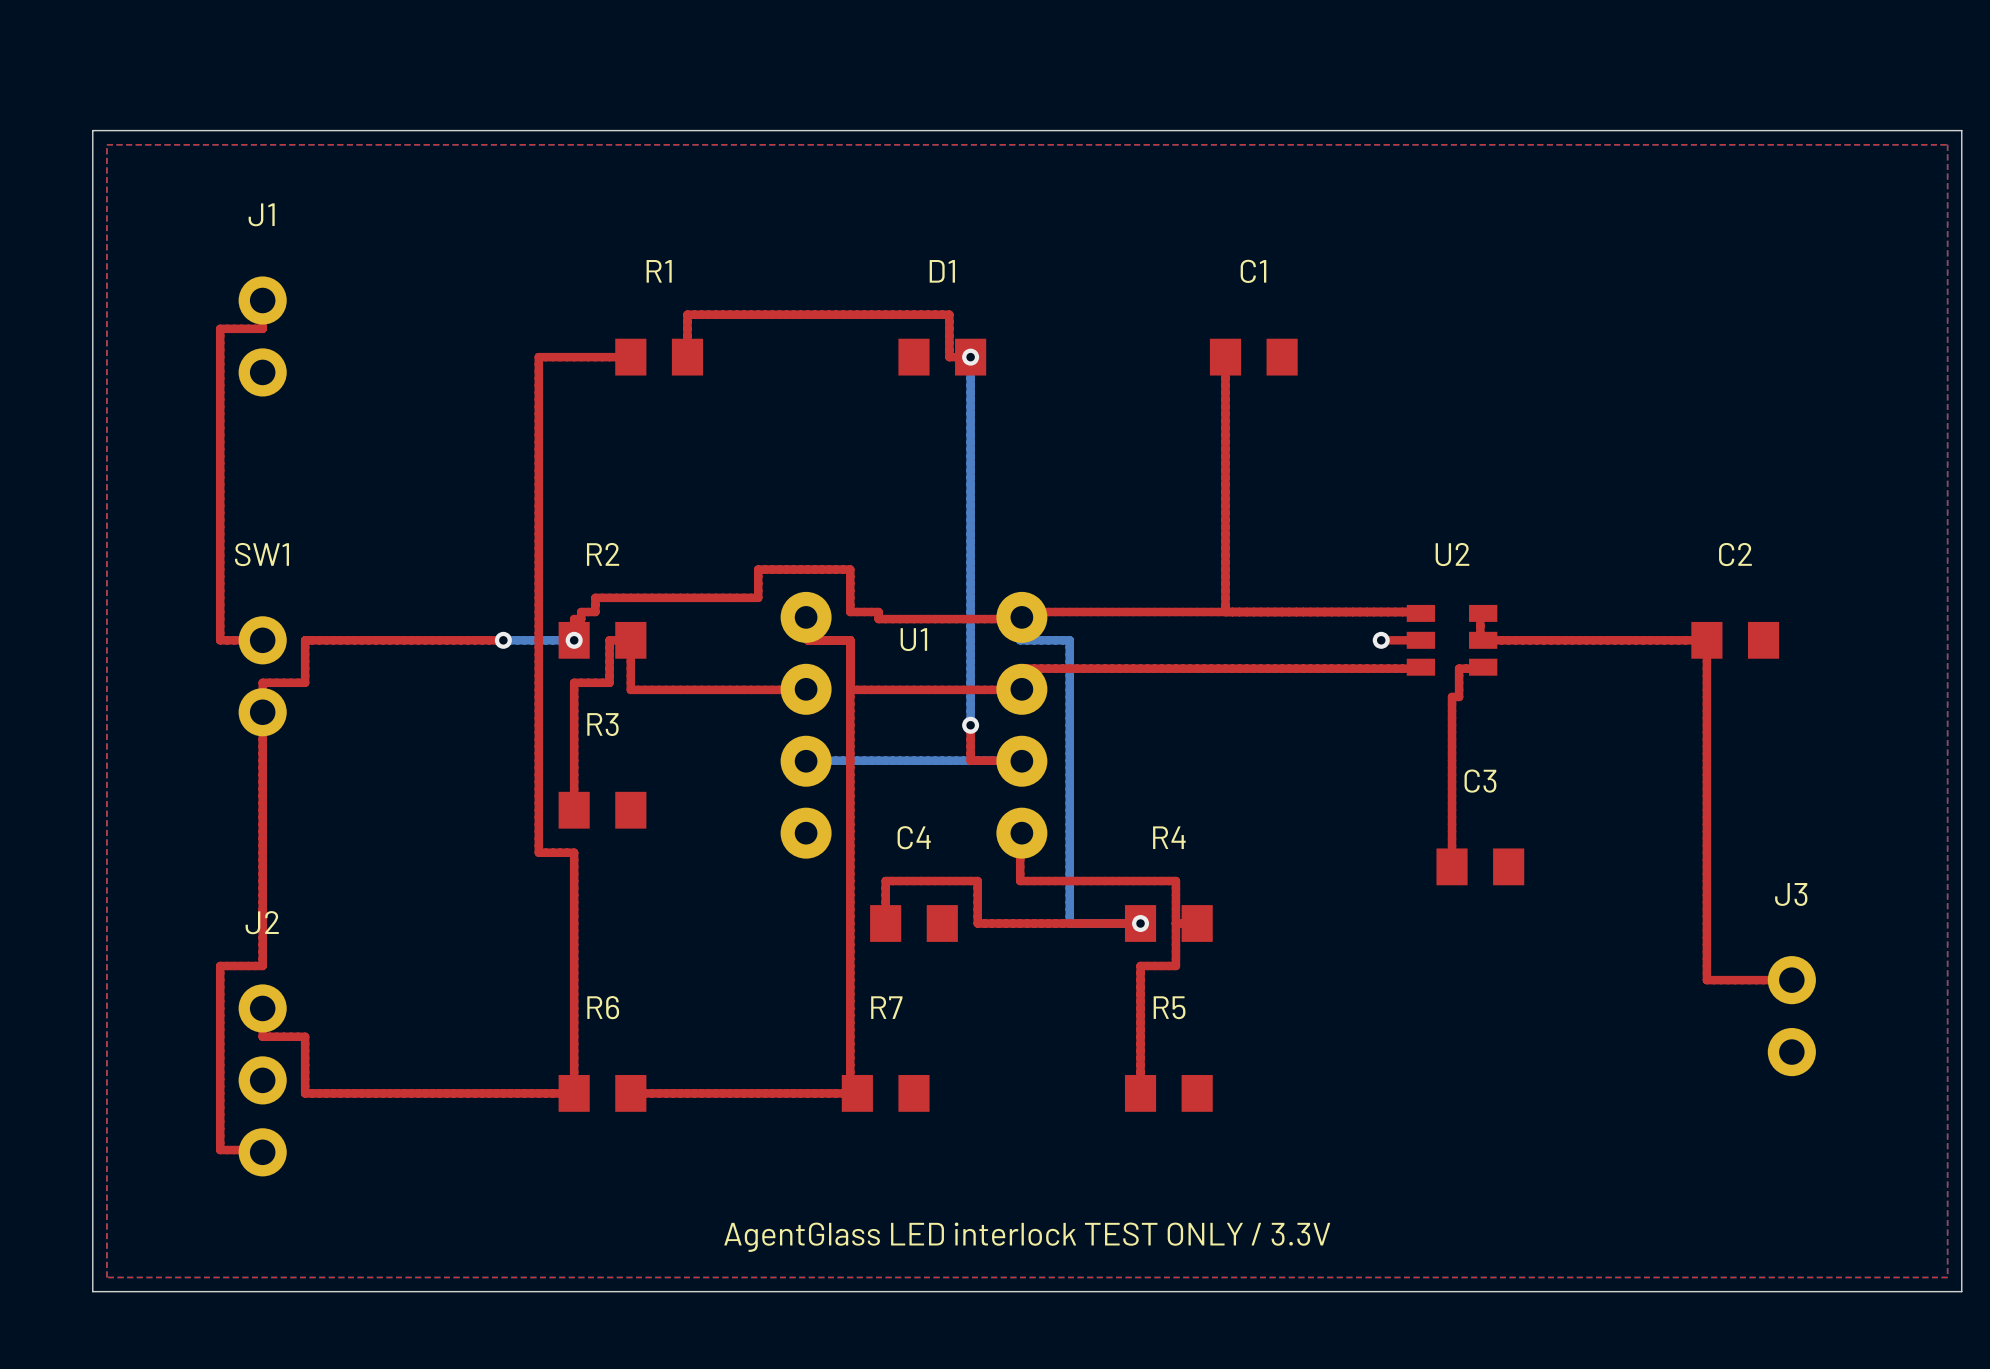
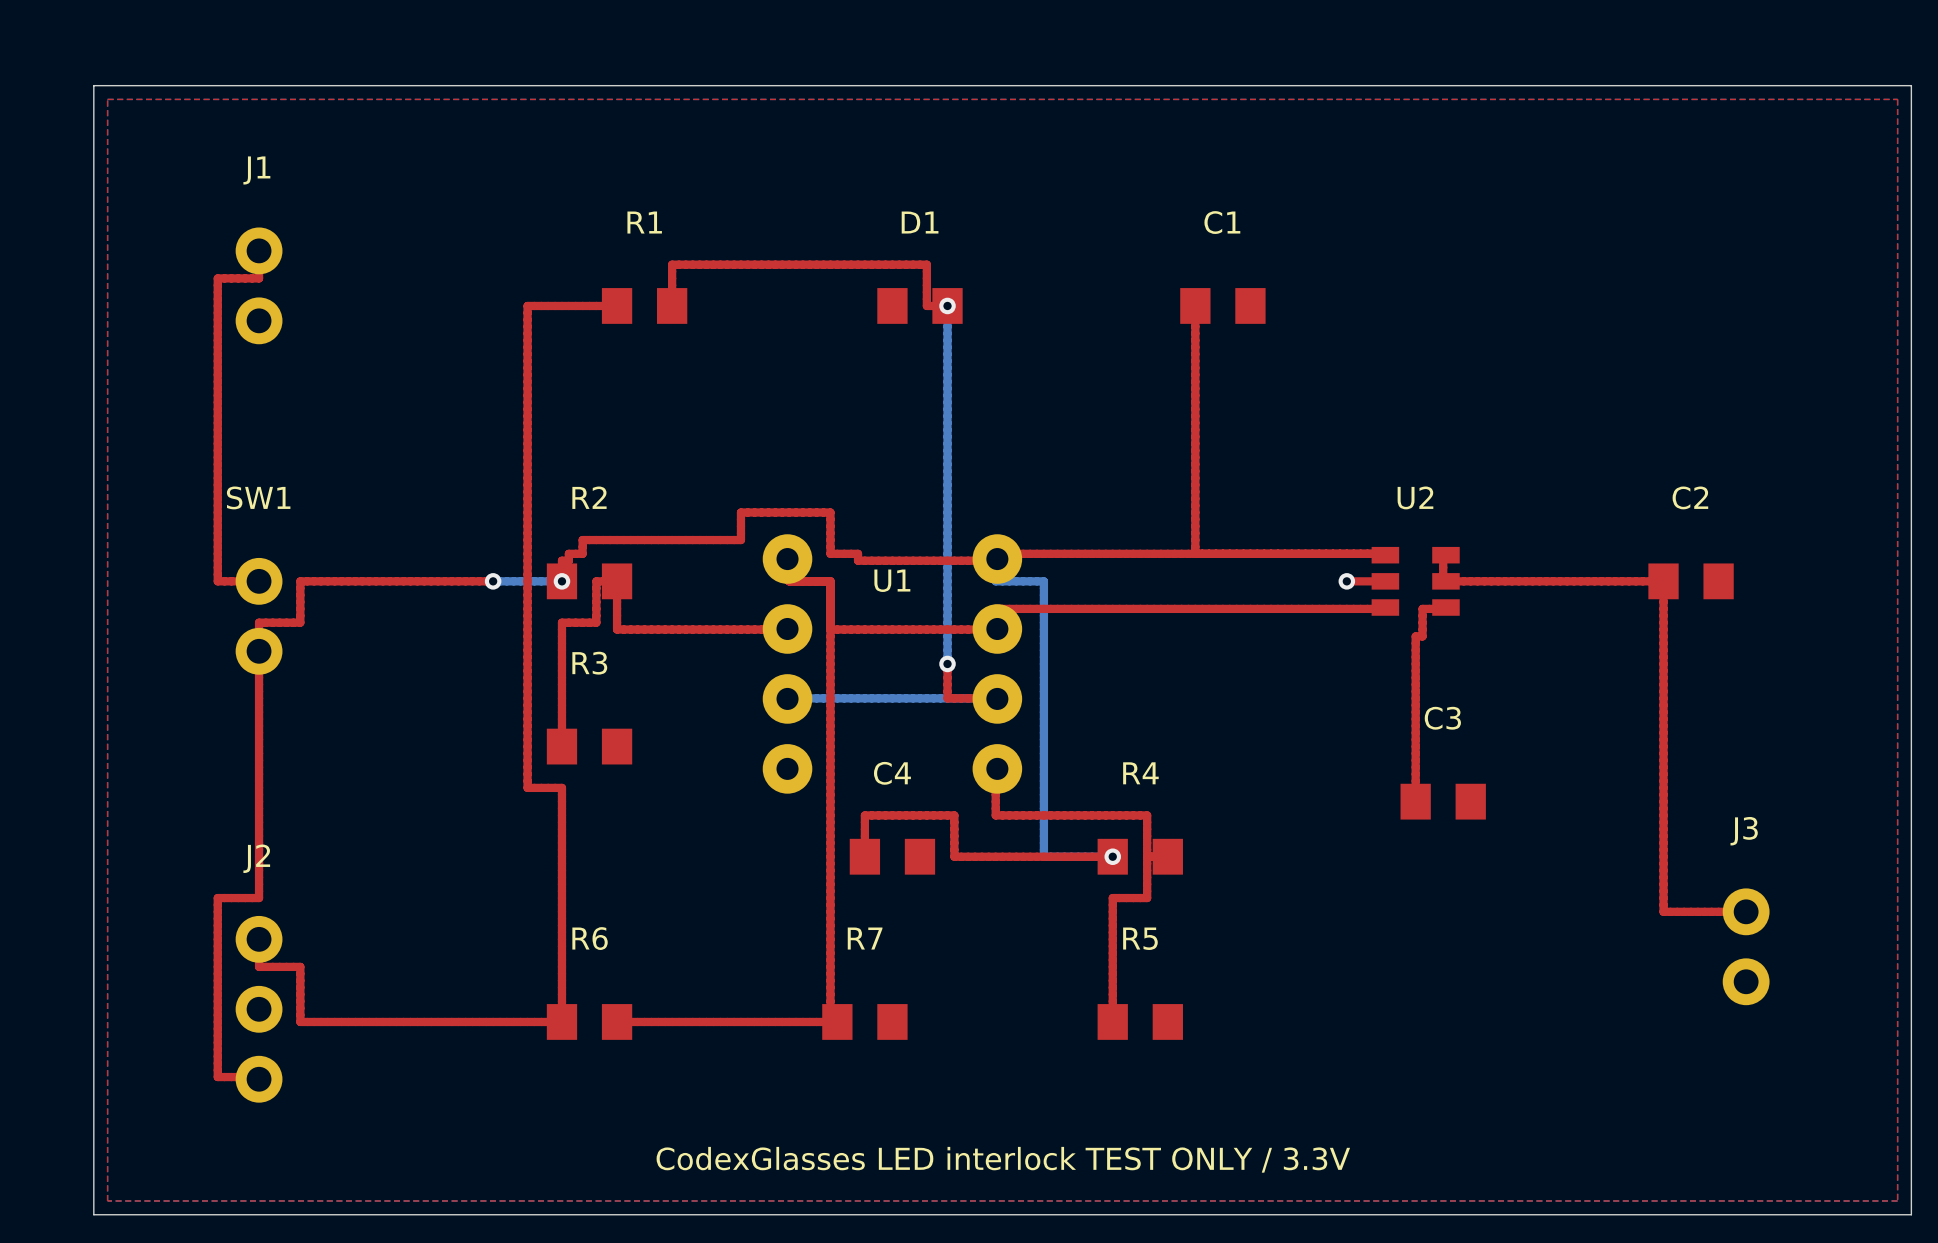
text: AgentGlass LED interlock TEST ONLY / 3.3V (1027, 1237) -> CodexGlasses LED interlock TEST ONLY / 3.3V (1003, 1159)

